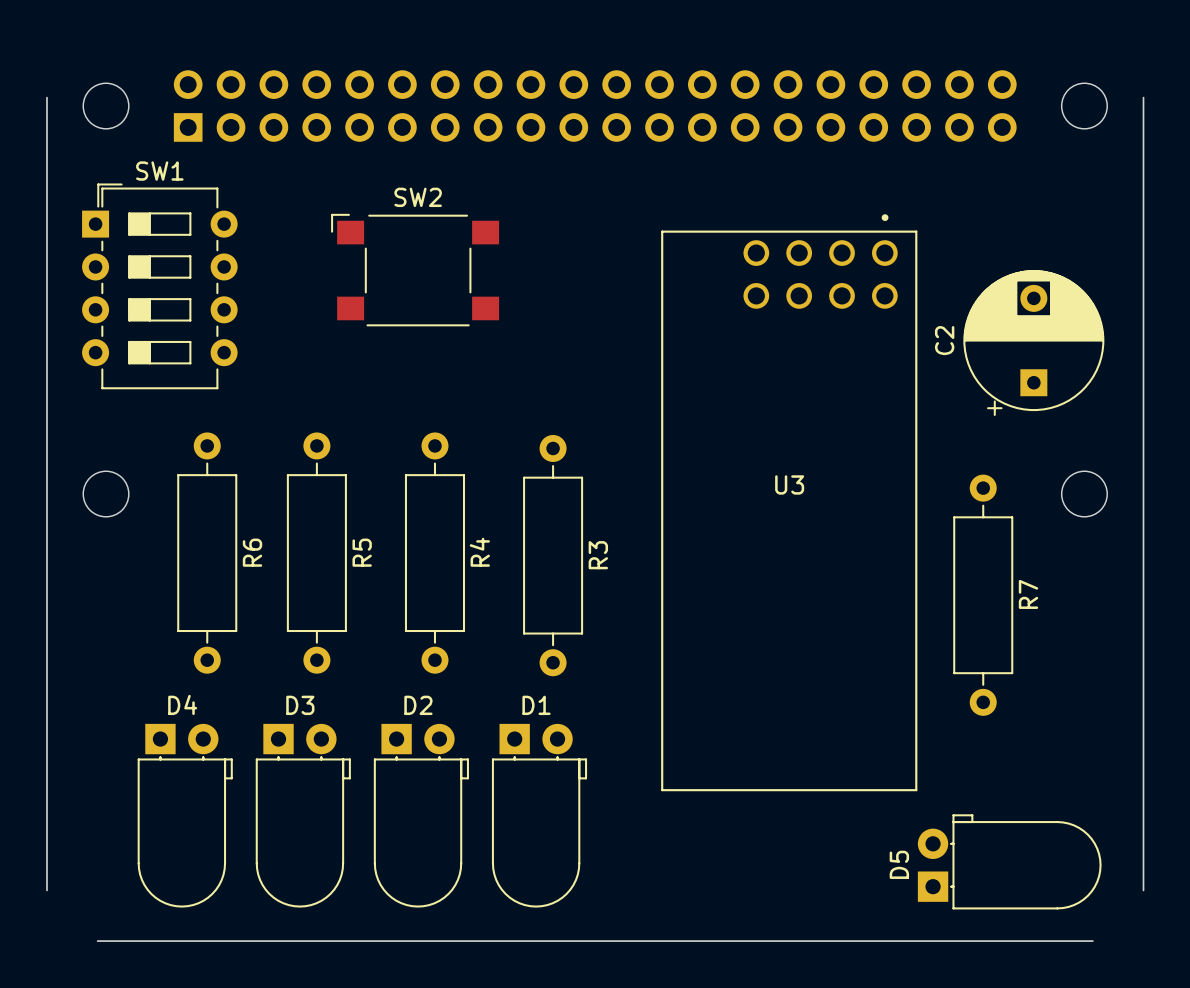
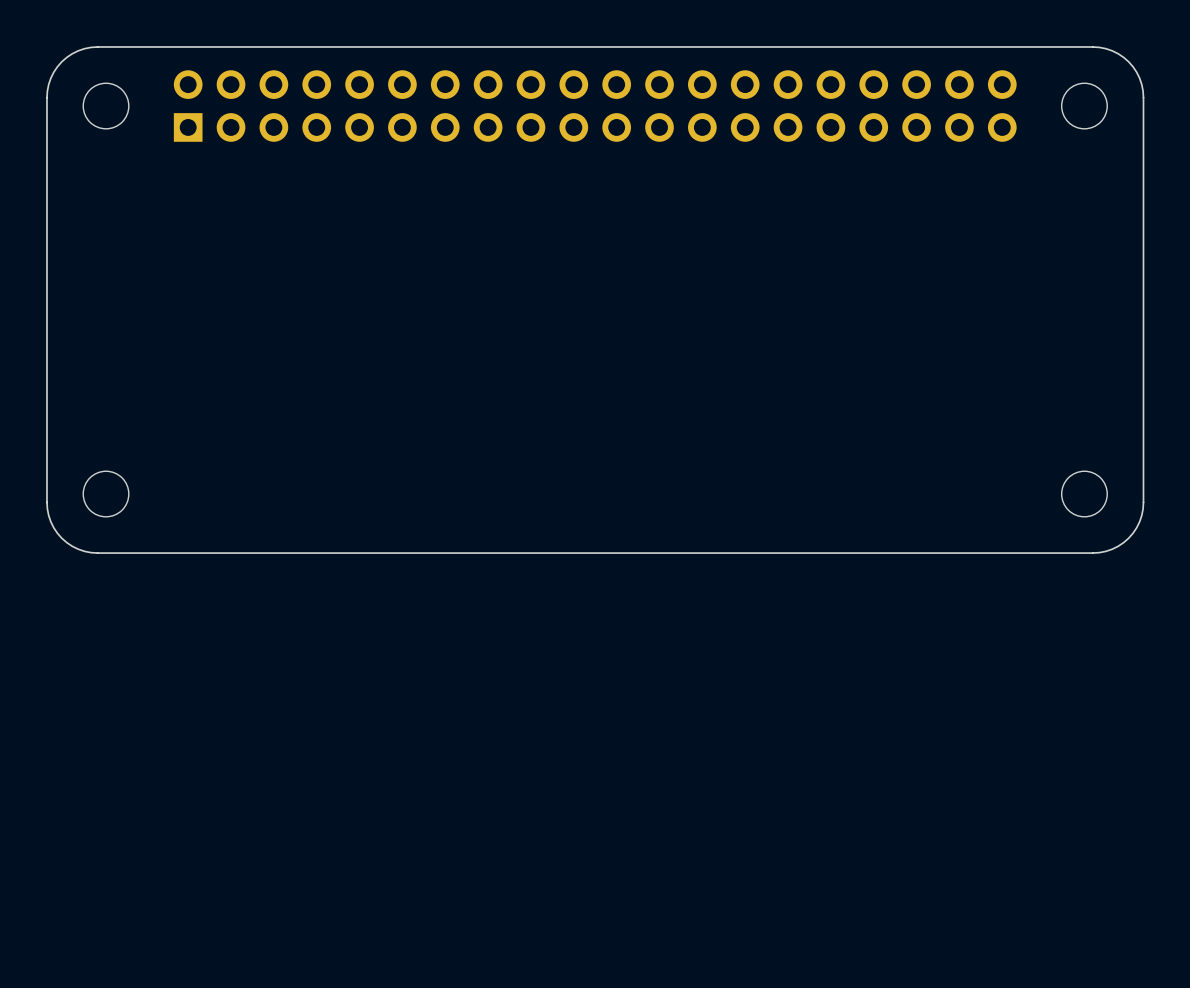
board edge: none -> (46, 97) (50, 78) (61, 61) (78, 50) (97, 46) (1092, 46) (1112, 50) (1128, 61) (1139, 78) (1143, 97)
SW2: (415, 270) -> none
SW1: (159, 286) -> none
C2: (1033, 343) -> none
board edge: (46, 502) (46, 890) -> (46, 502) (50, 521) (61, 538) (78, 549) (97, 553) (1092, 553) (1112, 549) (1128, 538) (1139, 521) (1143, 502)
U3: (789, 502) -> none
board edge: (1143, 502) (1143, 890) -> none
R6: (207, 553) -> none
R5: (316, 553) -> none
R4: (434, 553) -> none
R3: (553, 555) -> none
R7: (983, 595) -> none
D4: (185, 815) -> none
D3: (303, 815) -> none
D2: (421, 815) -> none
D1: (539, 815) -> none
D5: (1009, 861) -> none
board edge: (97, 941) (1092, 941) -> none

